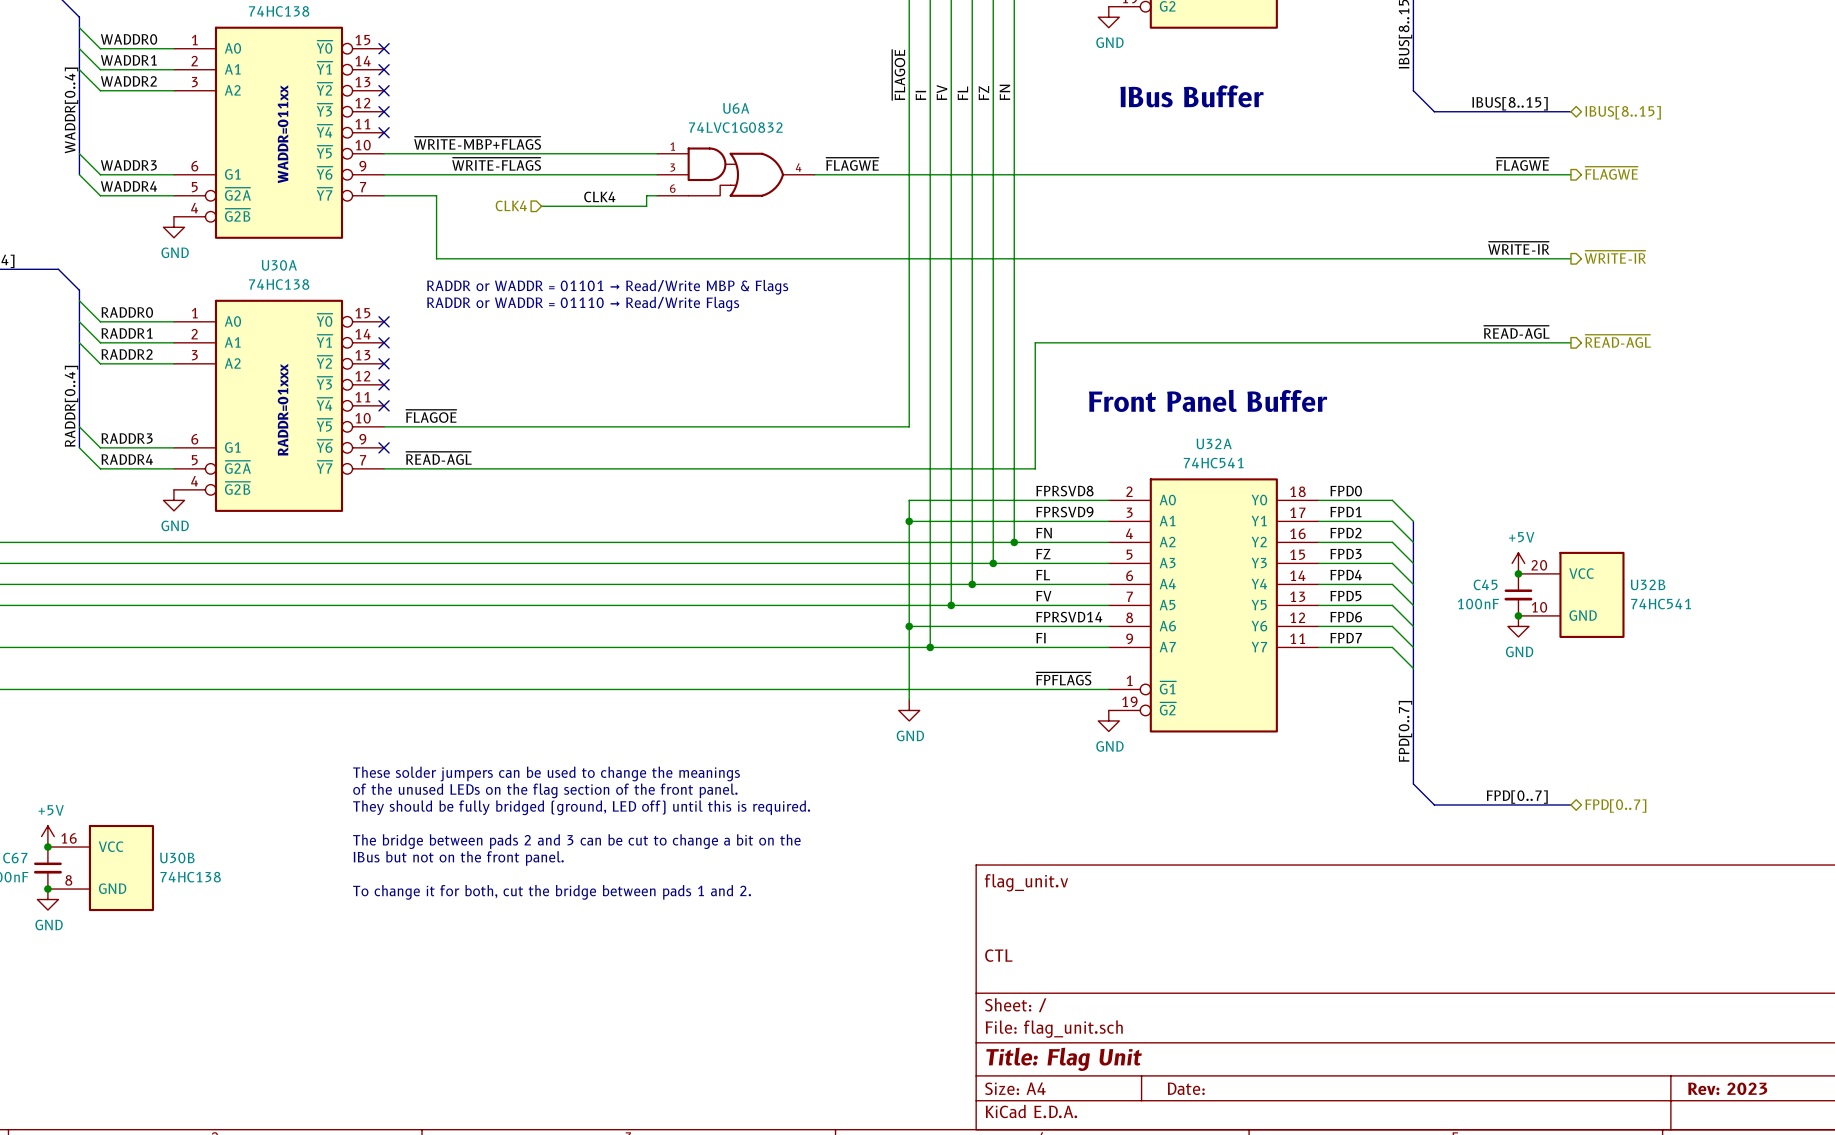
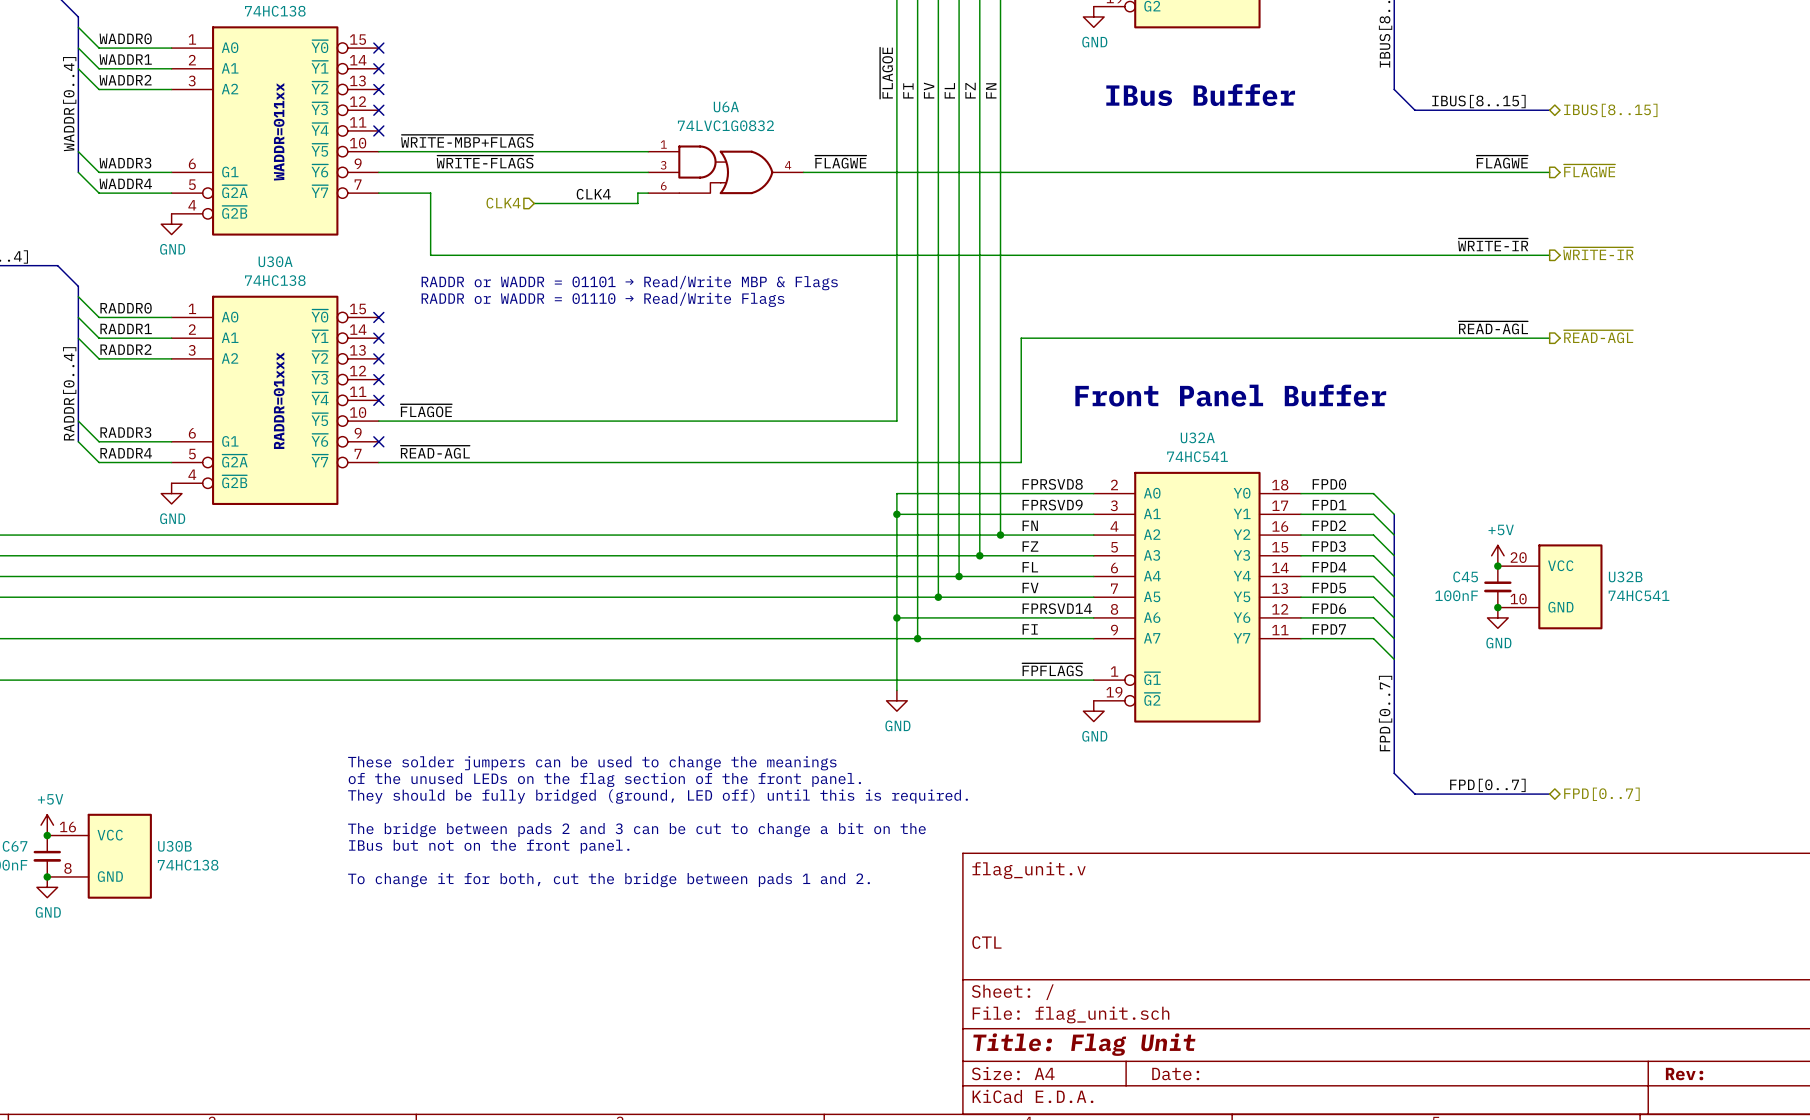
title block: Rev: 2023 (1727, 1088) -> Rev: (1684, 1074)

